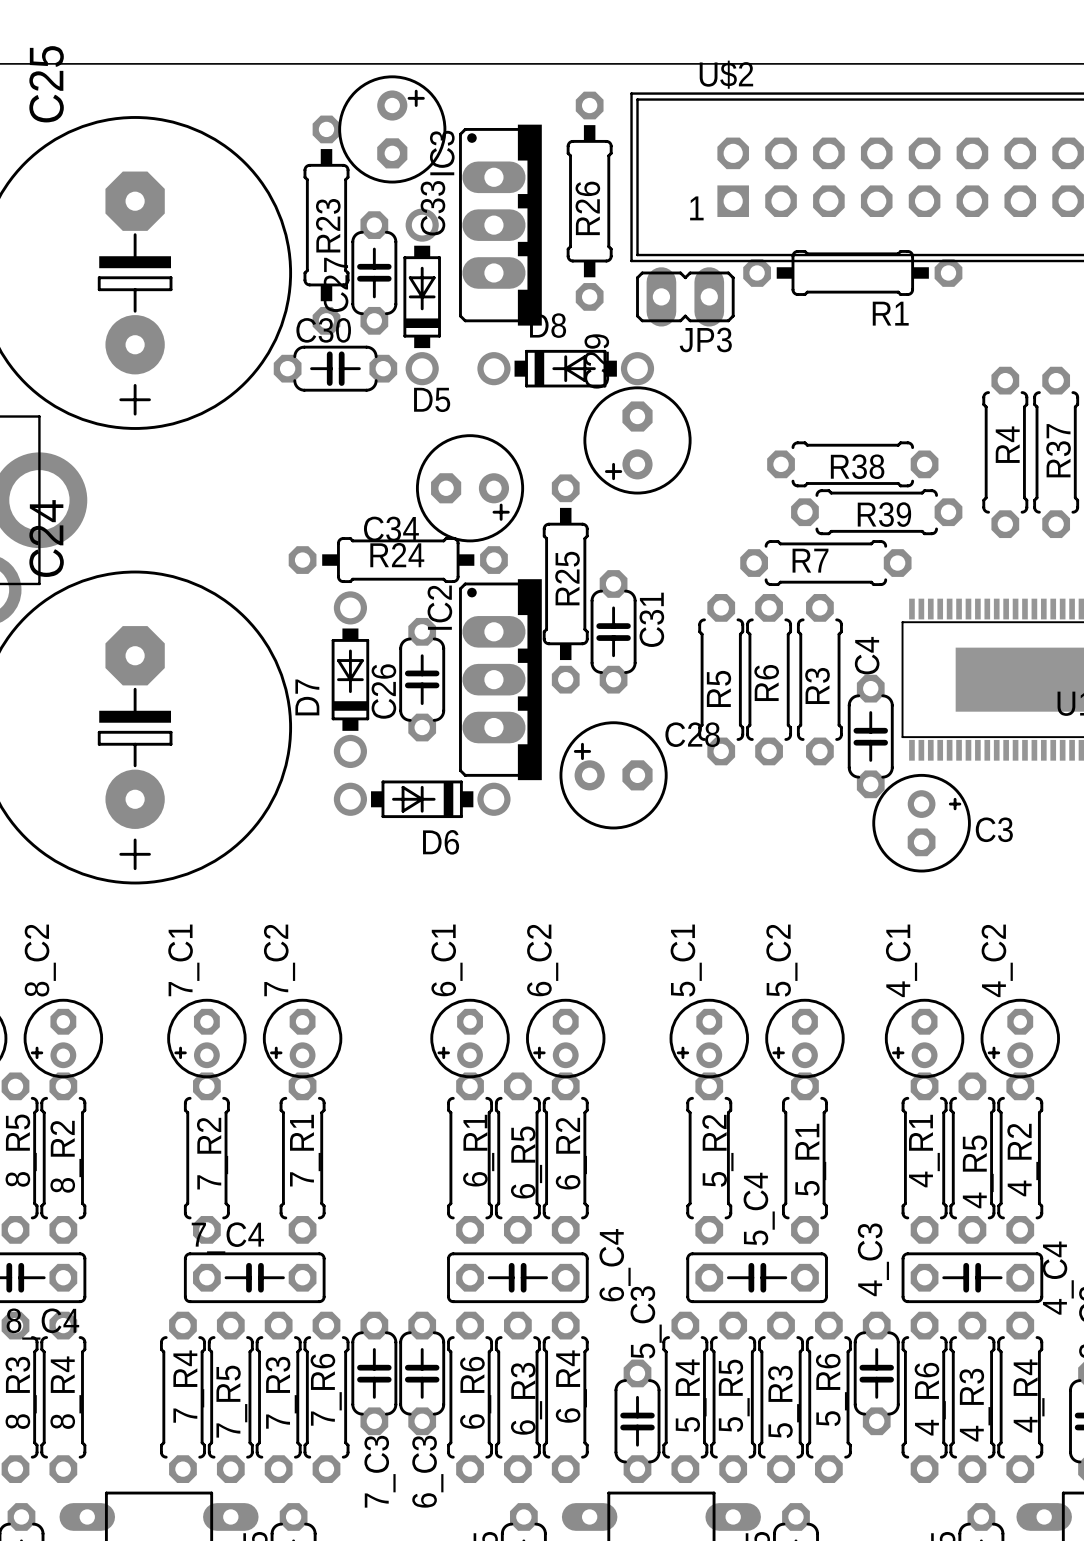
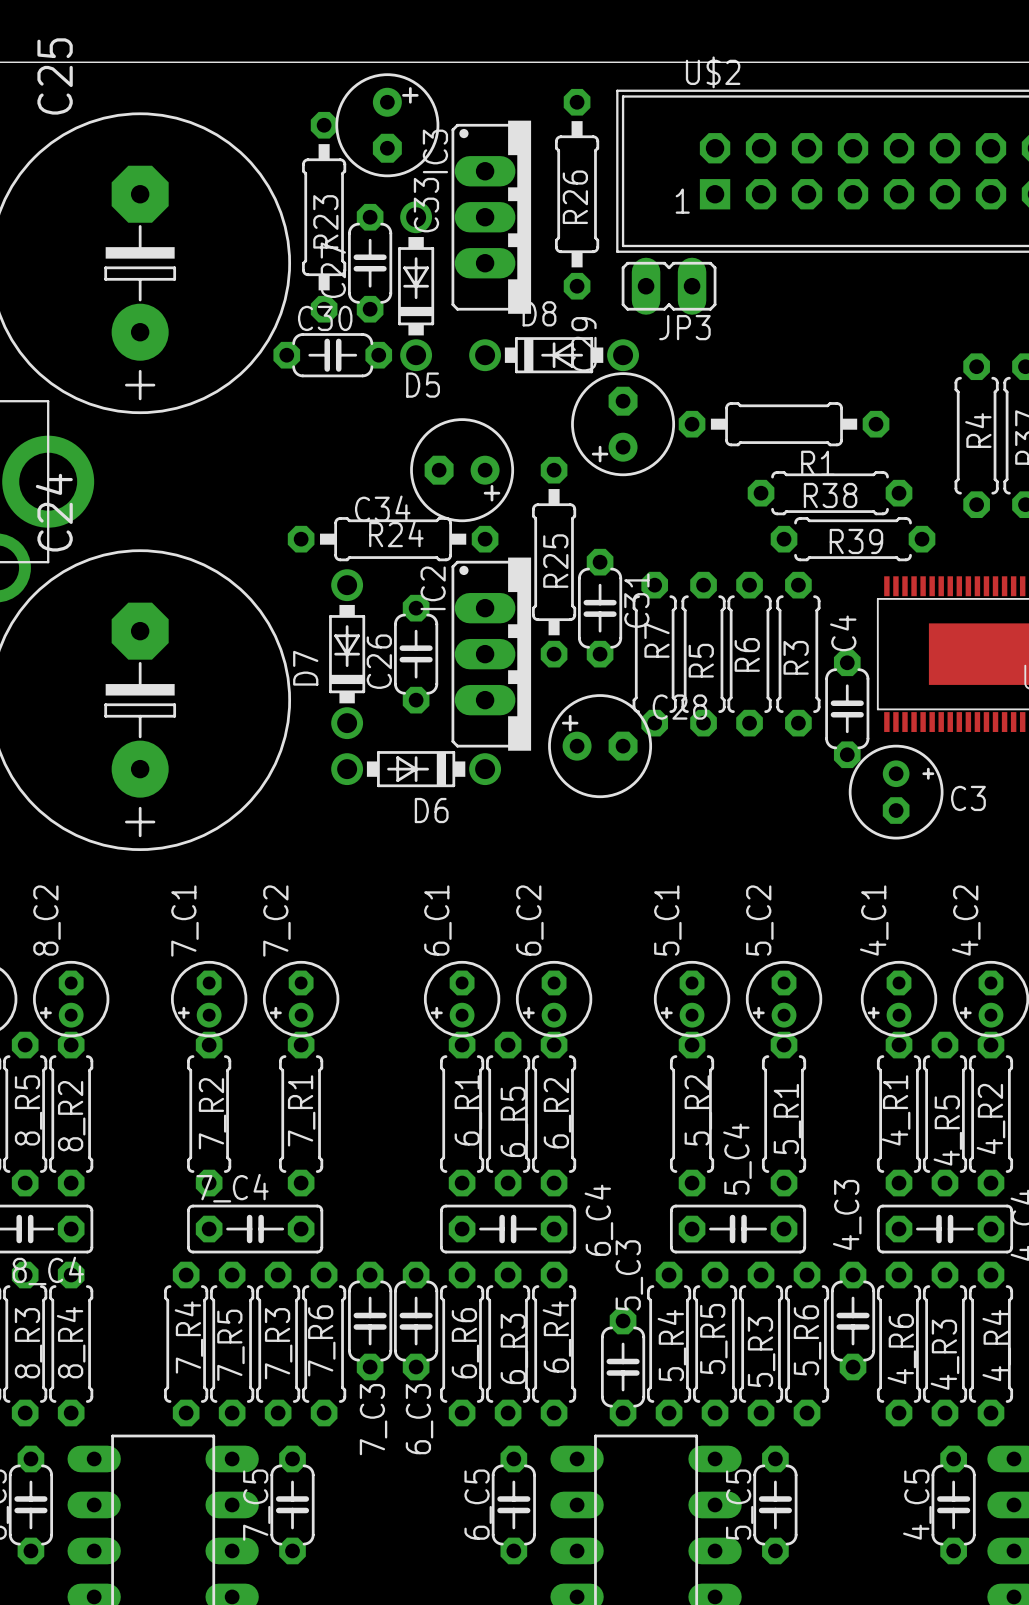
R1 position: (852, 272) -> (784, 424)
R38 position: (852, 464) -> (830, 493)
R39 position: (876, 512) -> (853, 539)
R7 rotation: 0° (825, 563) -> 90° clockwise (654, 654)
R7 position: (825, 563) -> (654, 654)

